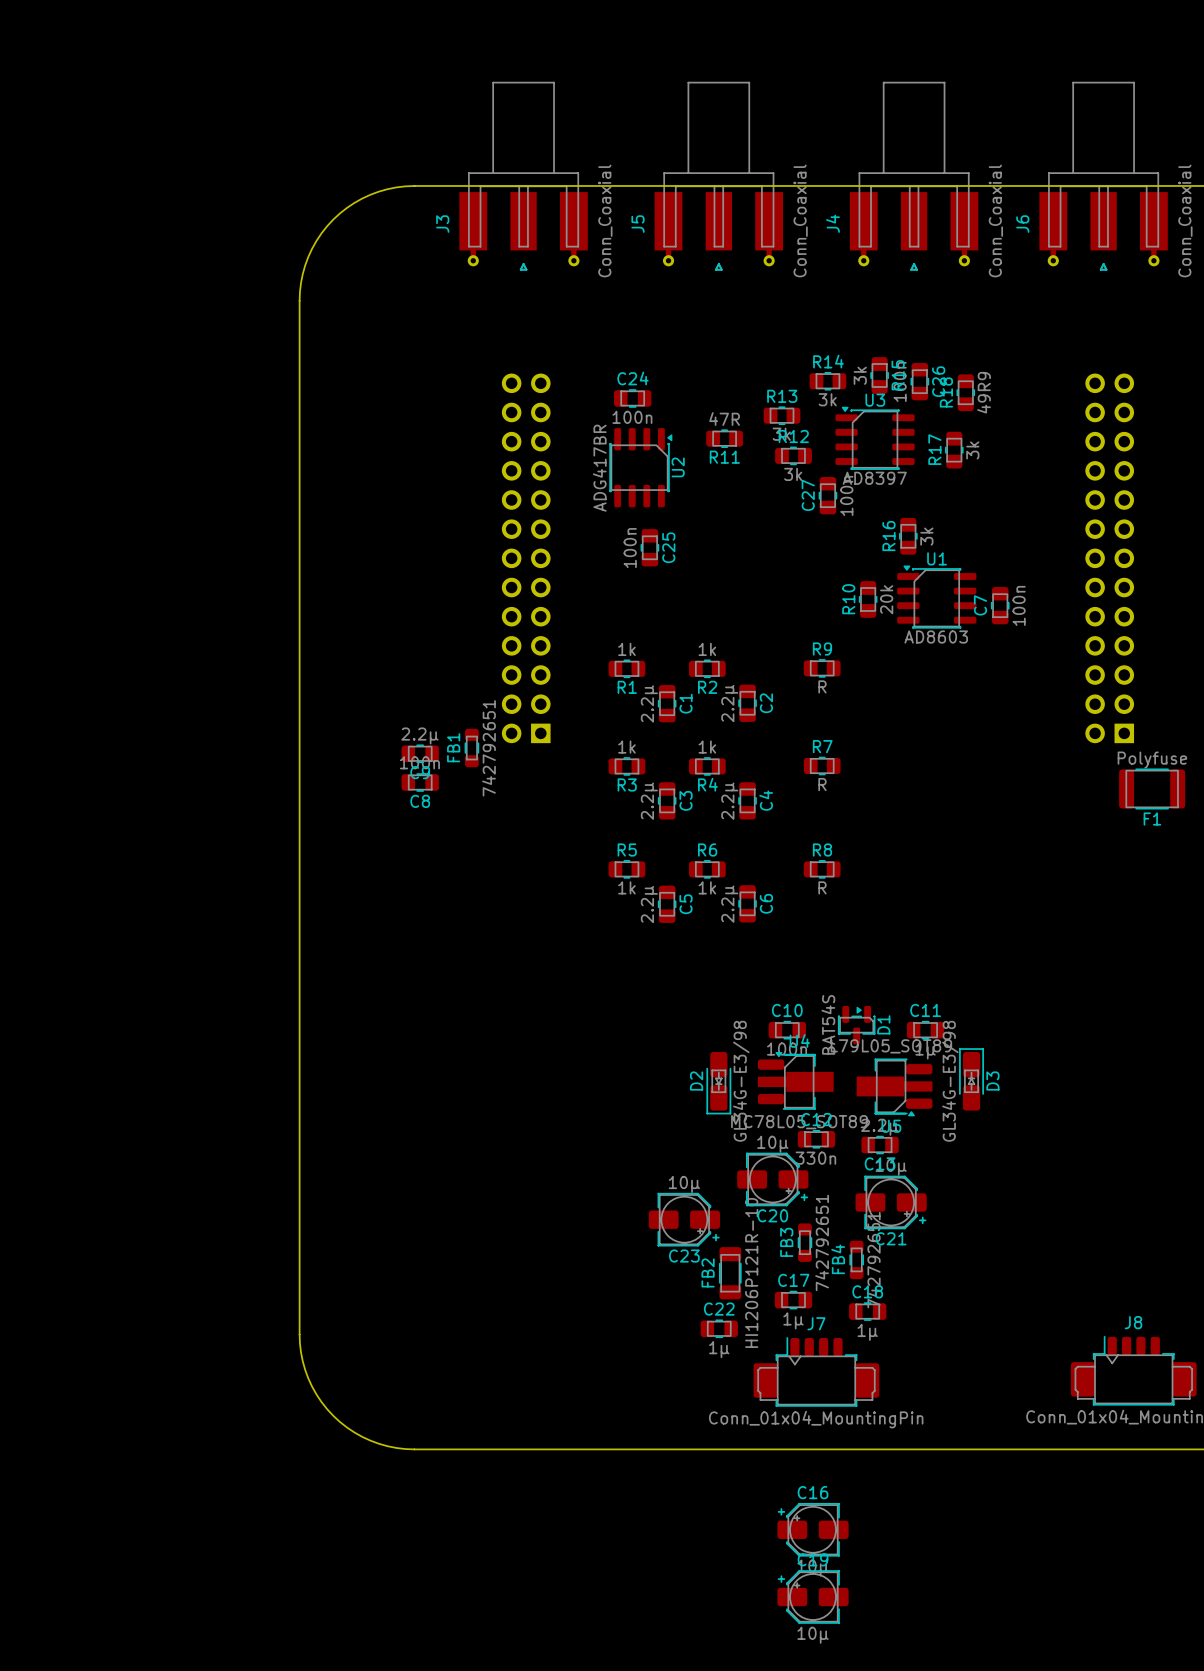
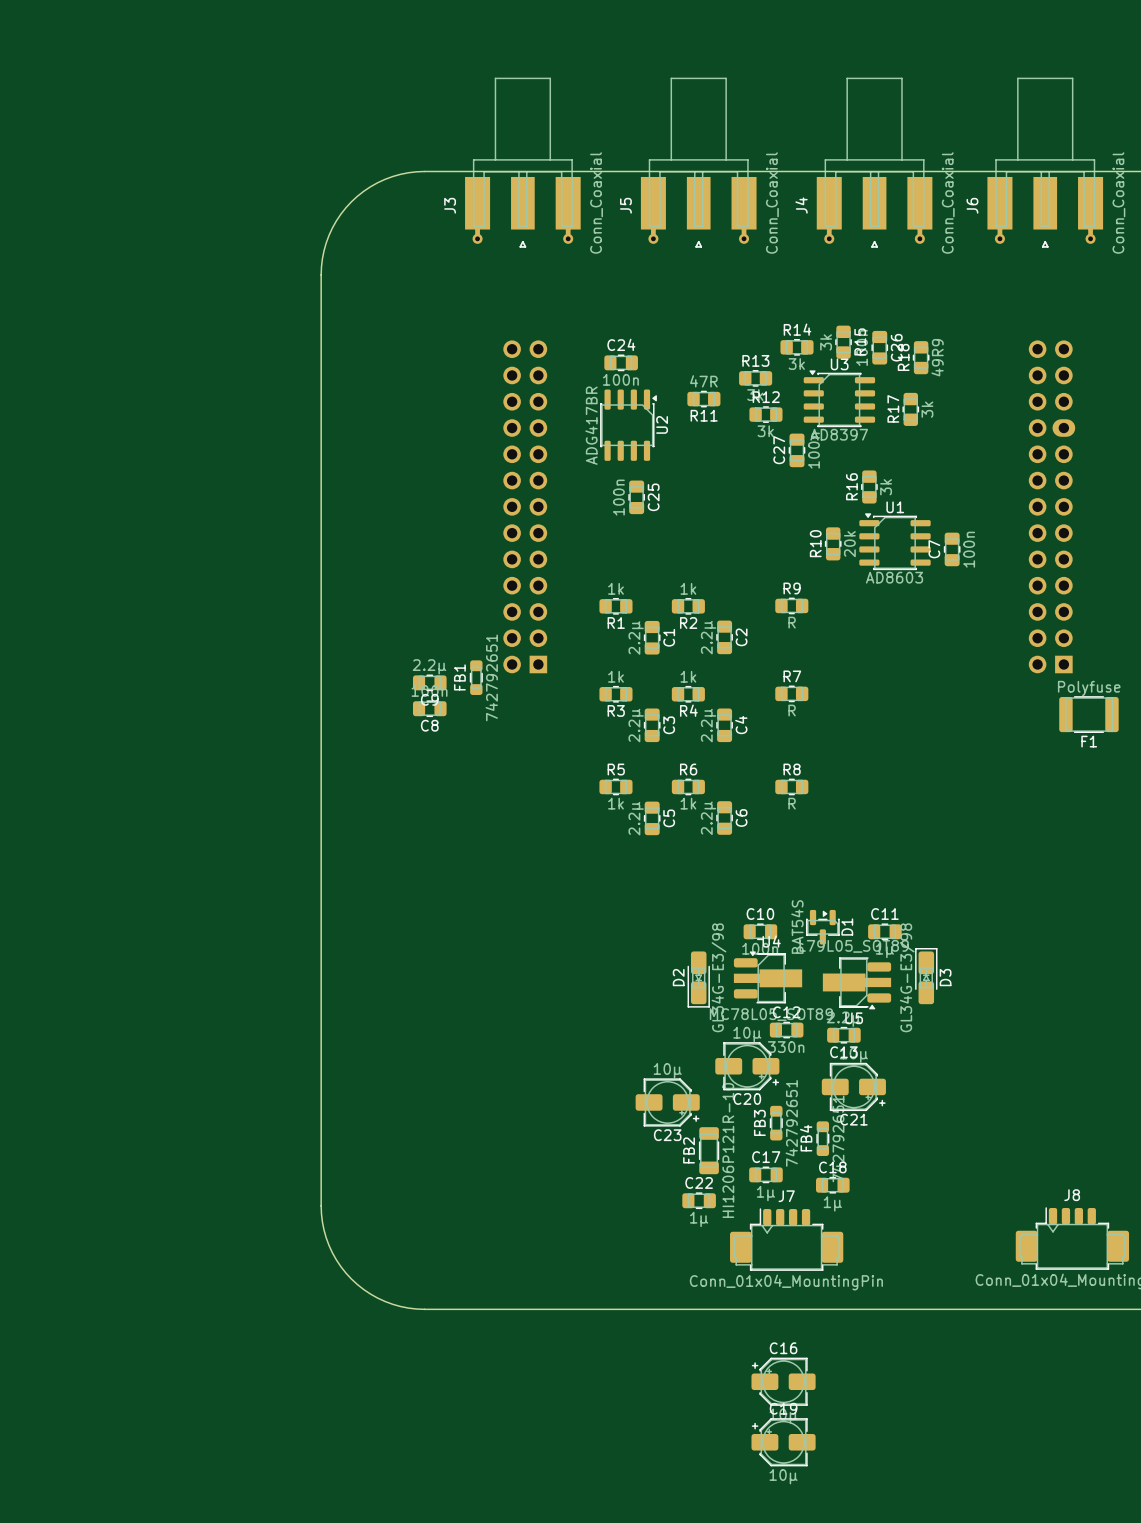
part footprint: [1085, 373, 1135, 744] -> [1028, 340, 1076, 674]

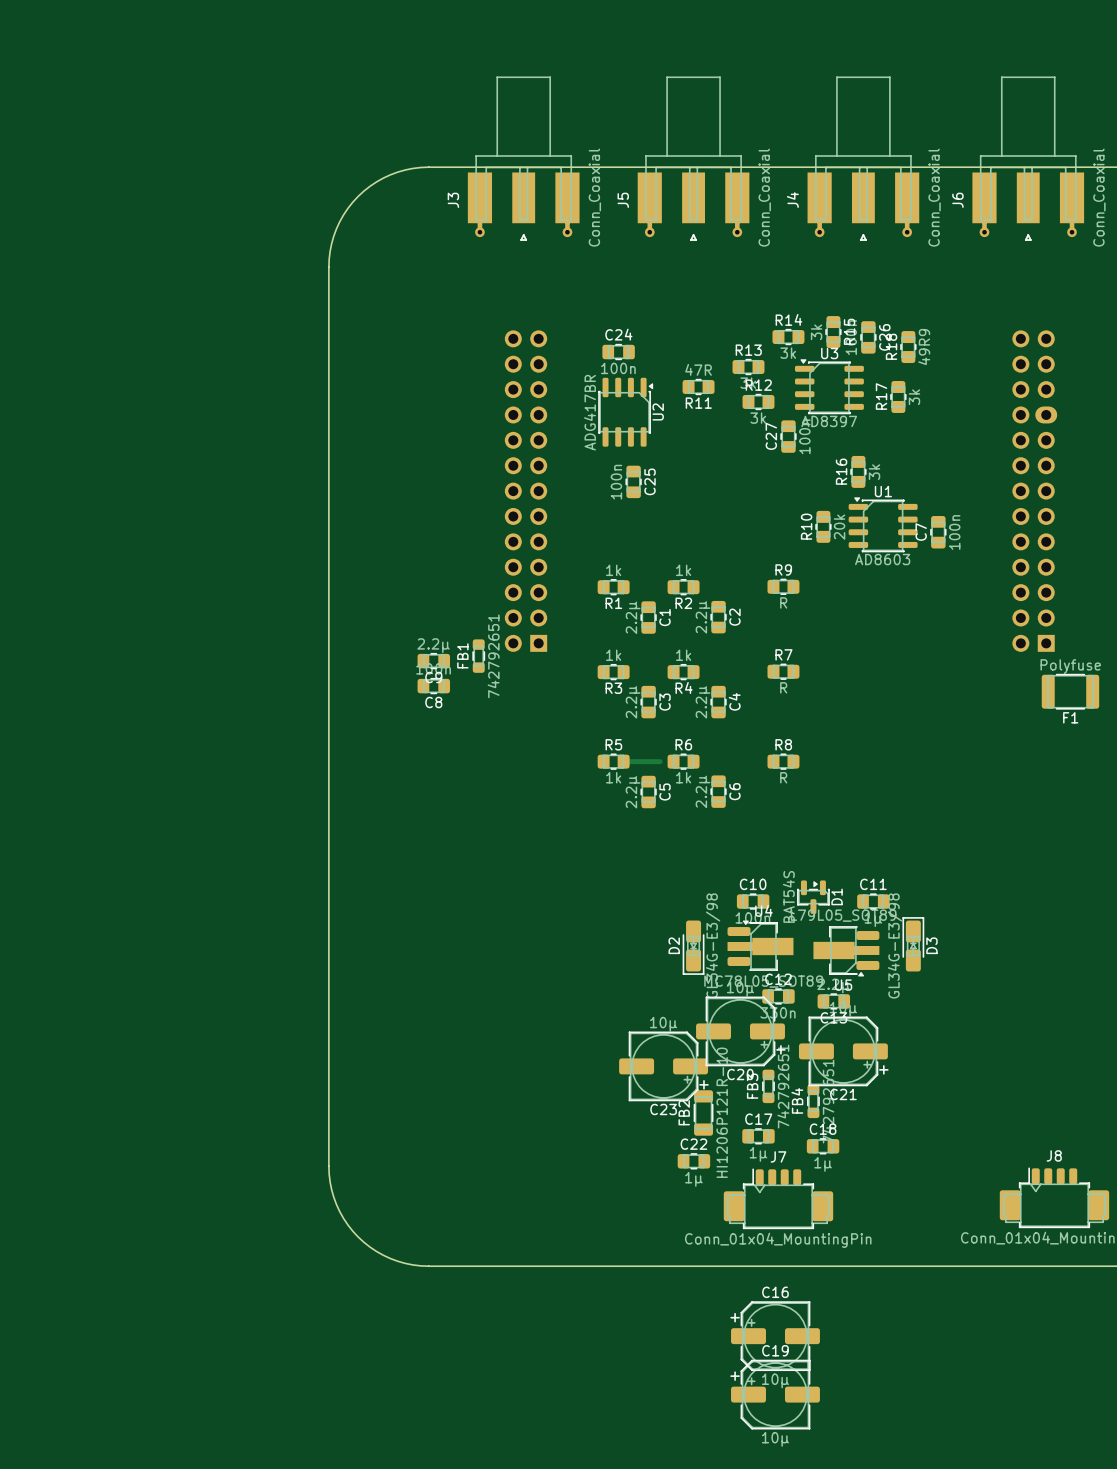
track: none -> (623, 761) (660, 761)
C20 footprint: [715, 1042, 780, 1091] -> [696, 996, 786, 1067]
C21 footprint: [821, 1062, 886, 1111] -> [798, 1016, 889, 1087]
C23 footprint: [635, 1078, 700, 1127] -> [619, 1031, 709, 1102]
C16 footprint: [751, 1357, 816, 1406] -> [730, 1301, 820, 1371]
C19 footprint: [751, 1418, 816, 1467] -> [730, 1359, 820, 1430]

